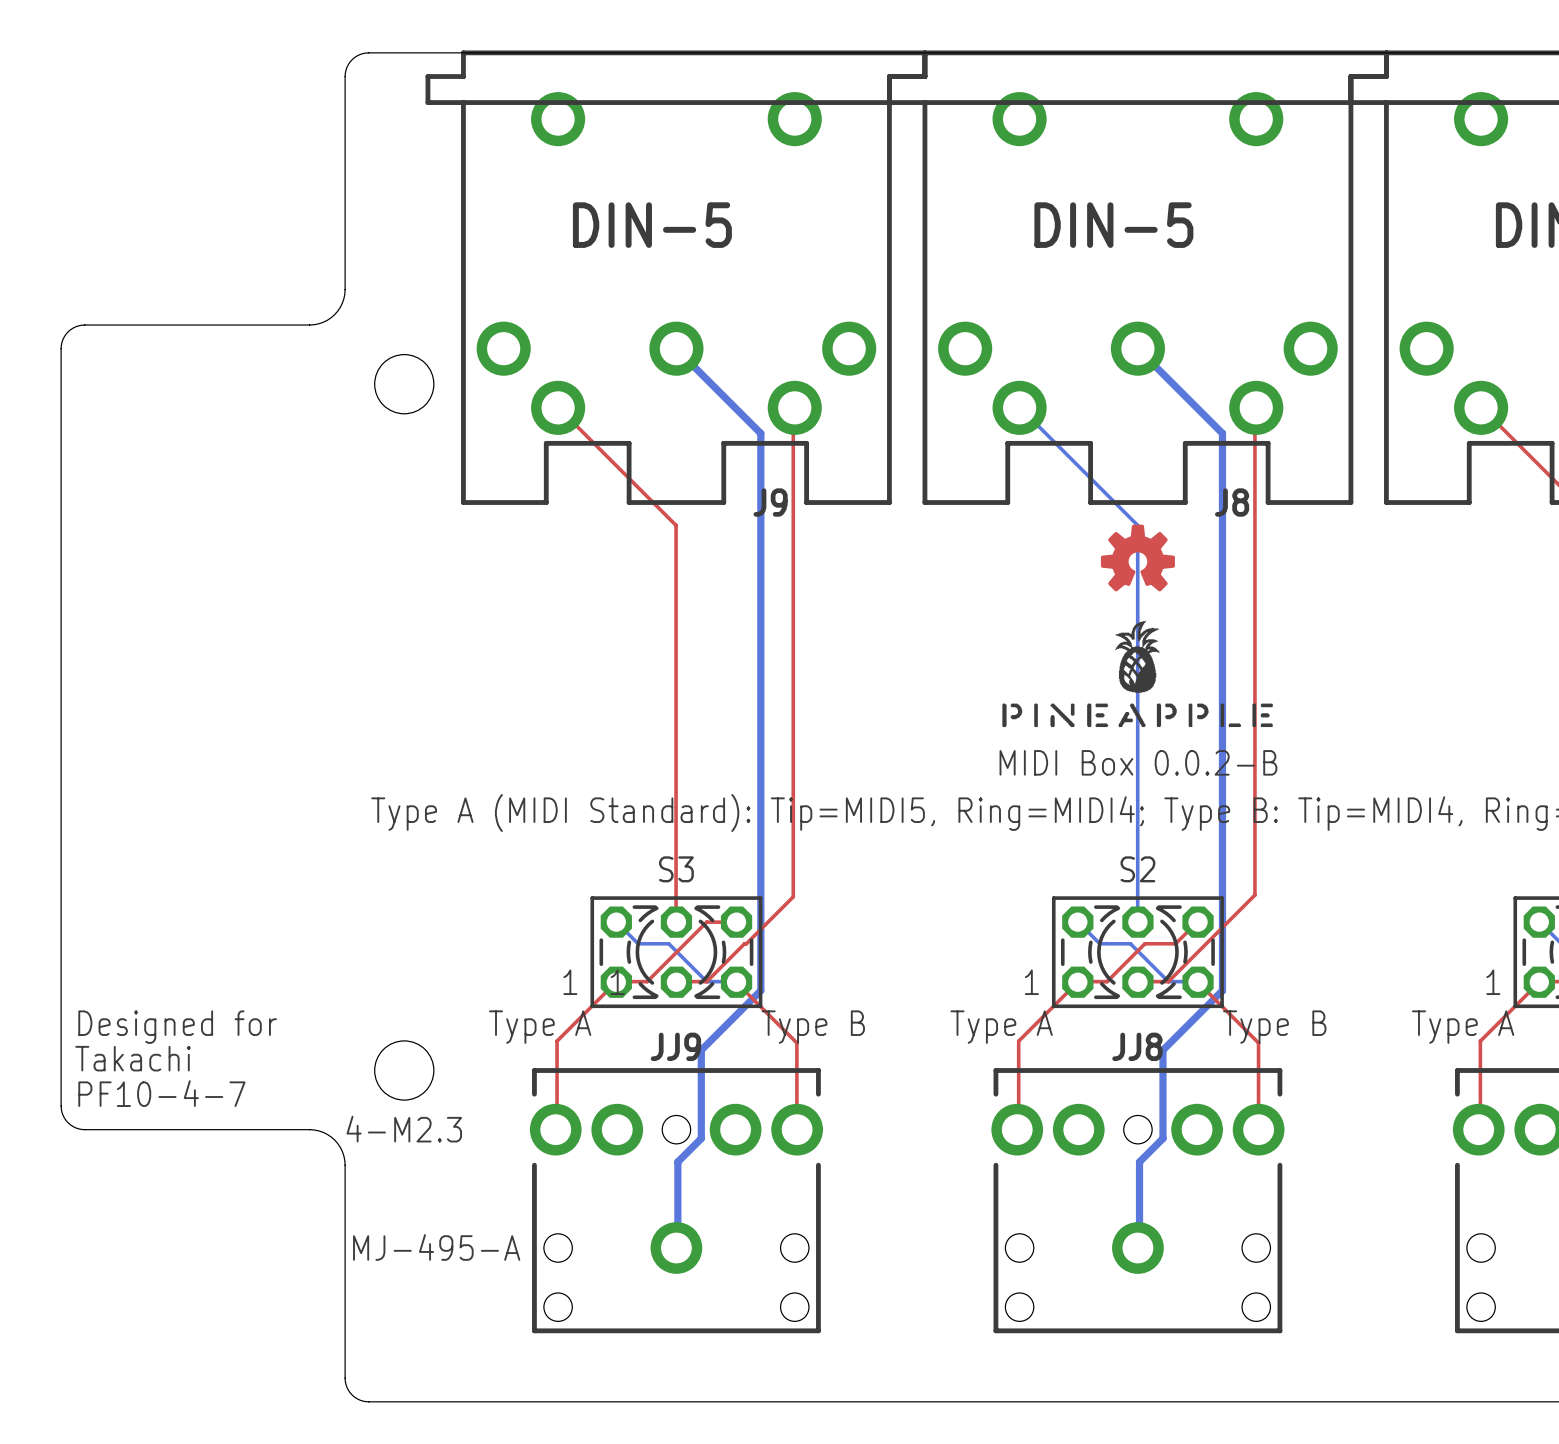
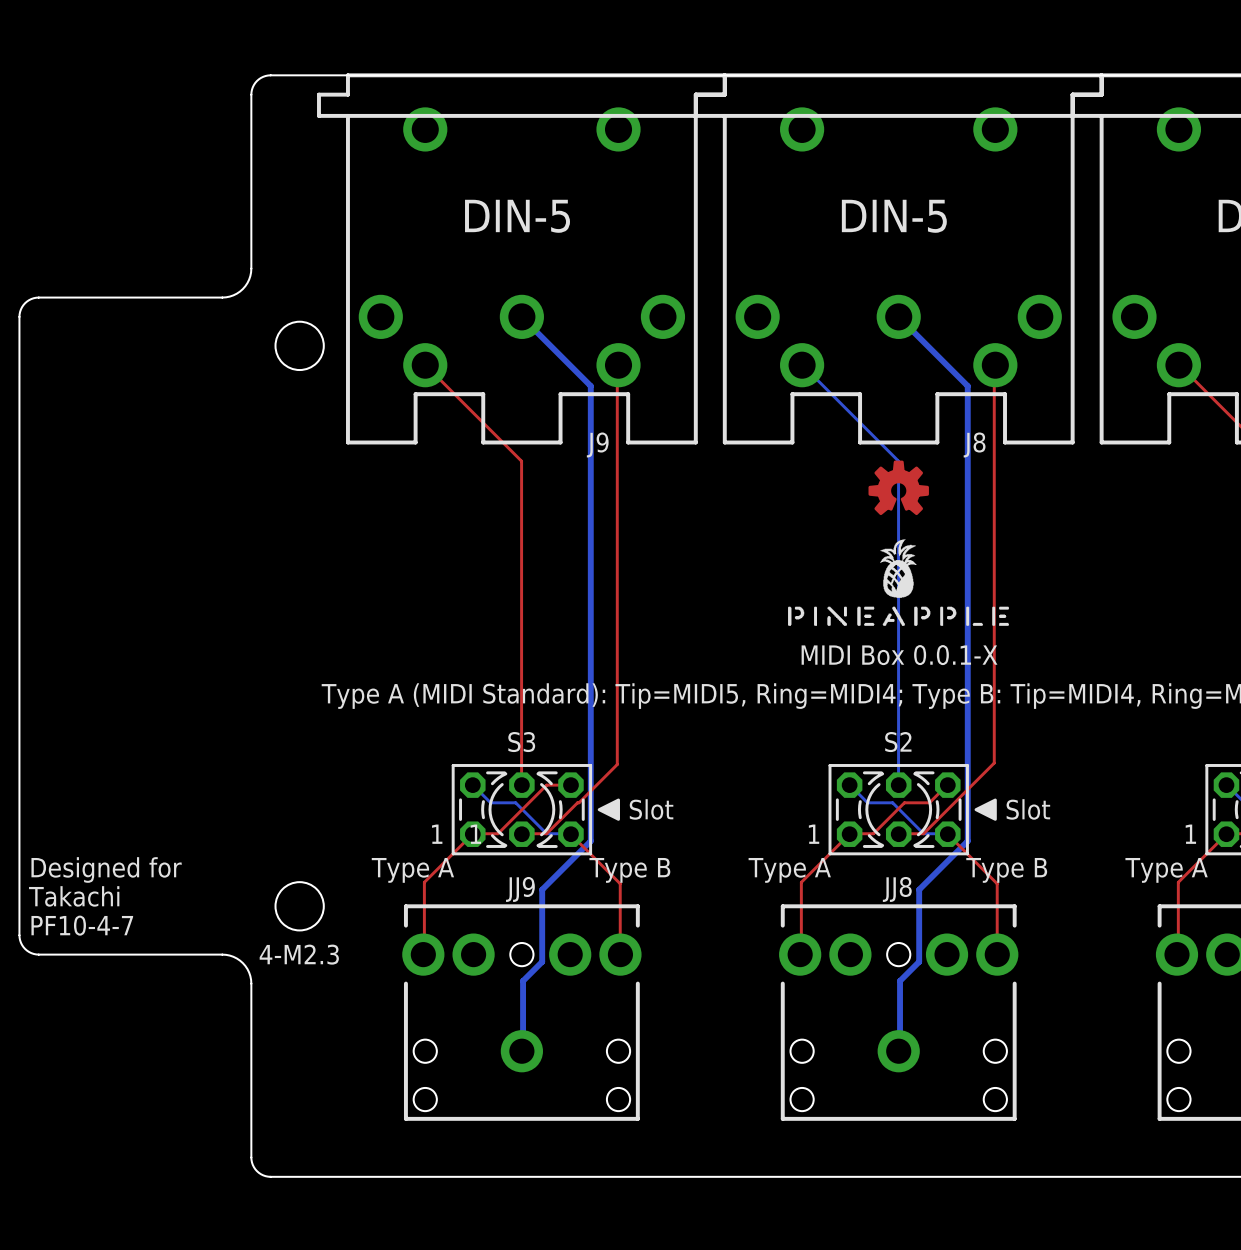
text: MIDI Box 0.0.2-B (1138, 762) -> MIDI Box 0.0.1-X (899, 655)
drawing: none -> [597, 798, 620, 821]
drawing: none -> [974, 798, 997, 821]
text: none -> Slot (651, 809)
text: none -> Slot (1028, 809)
text: MJ-495-A (436, 1247) -> none

